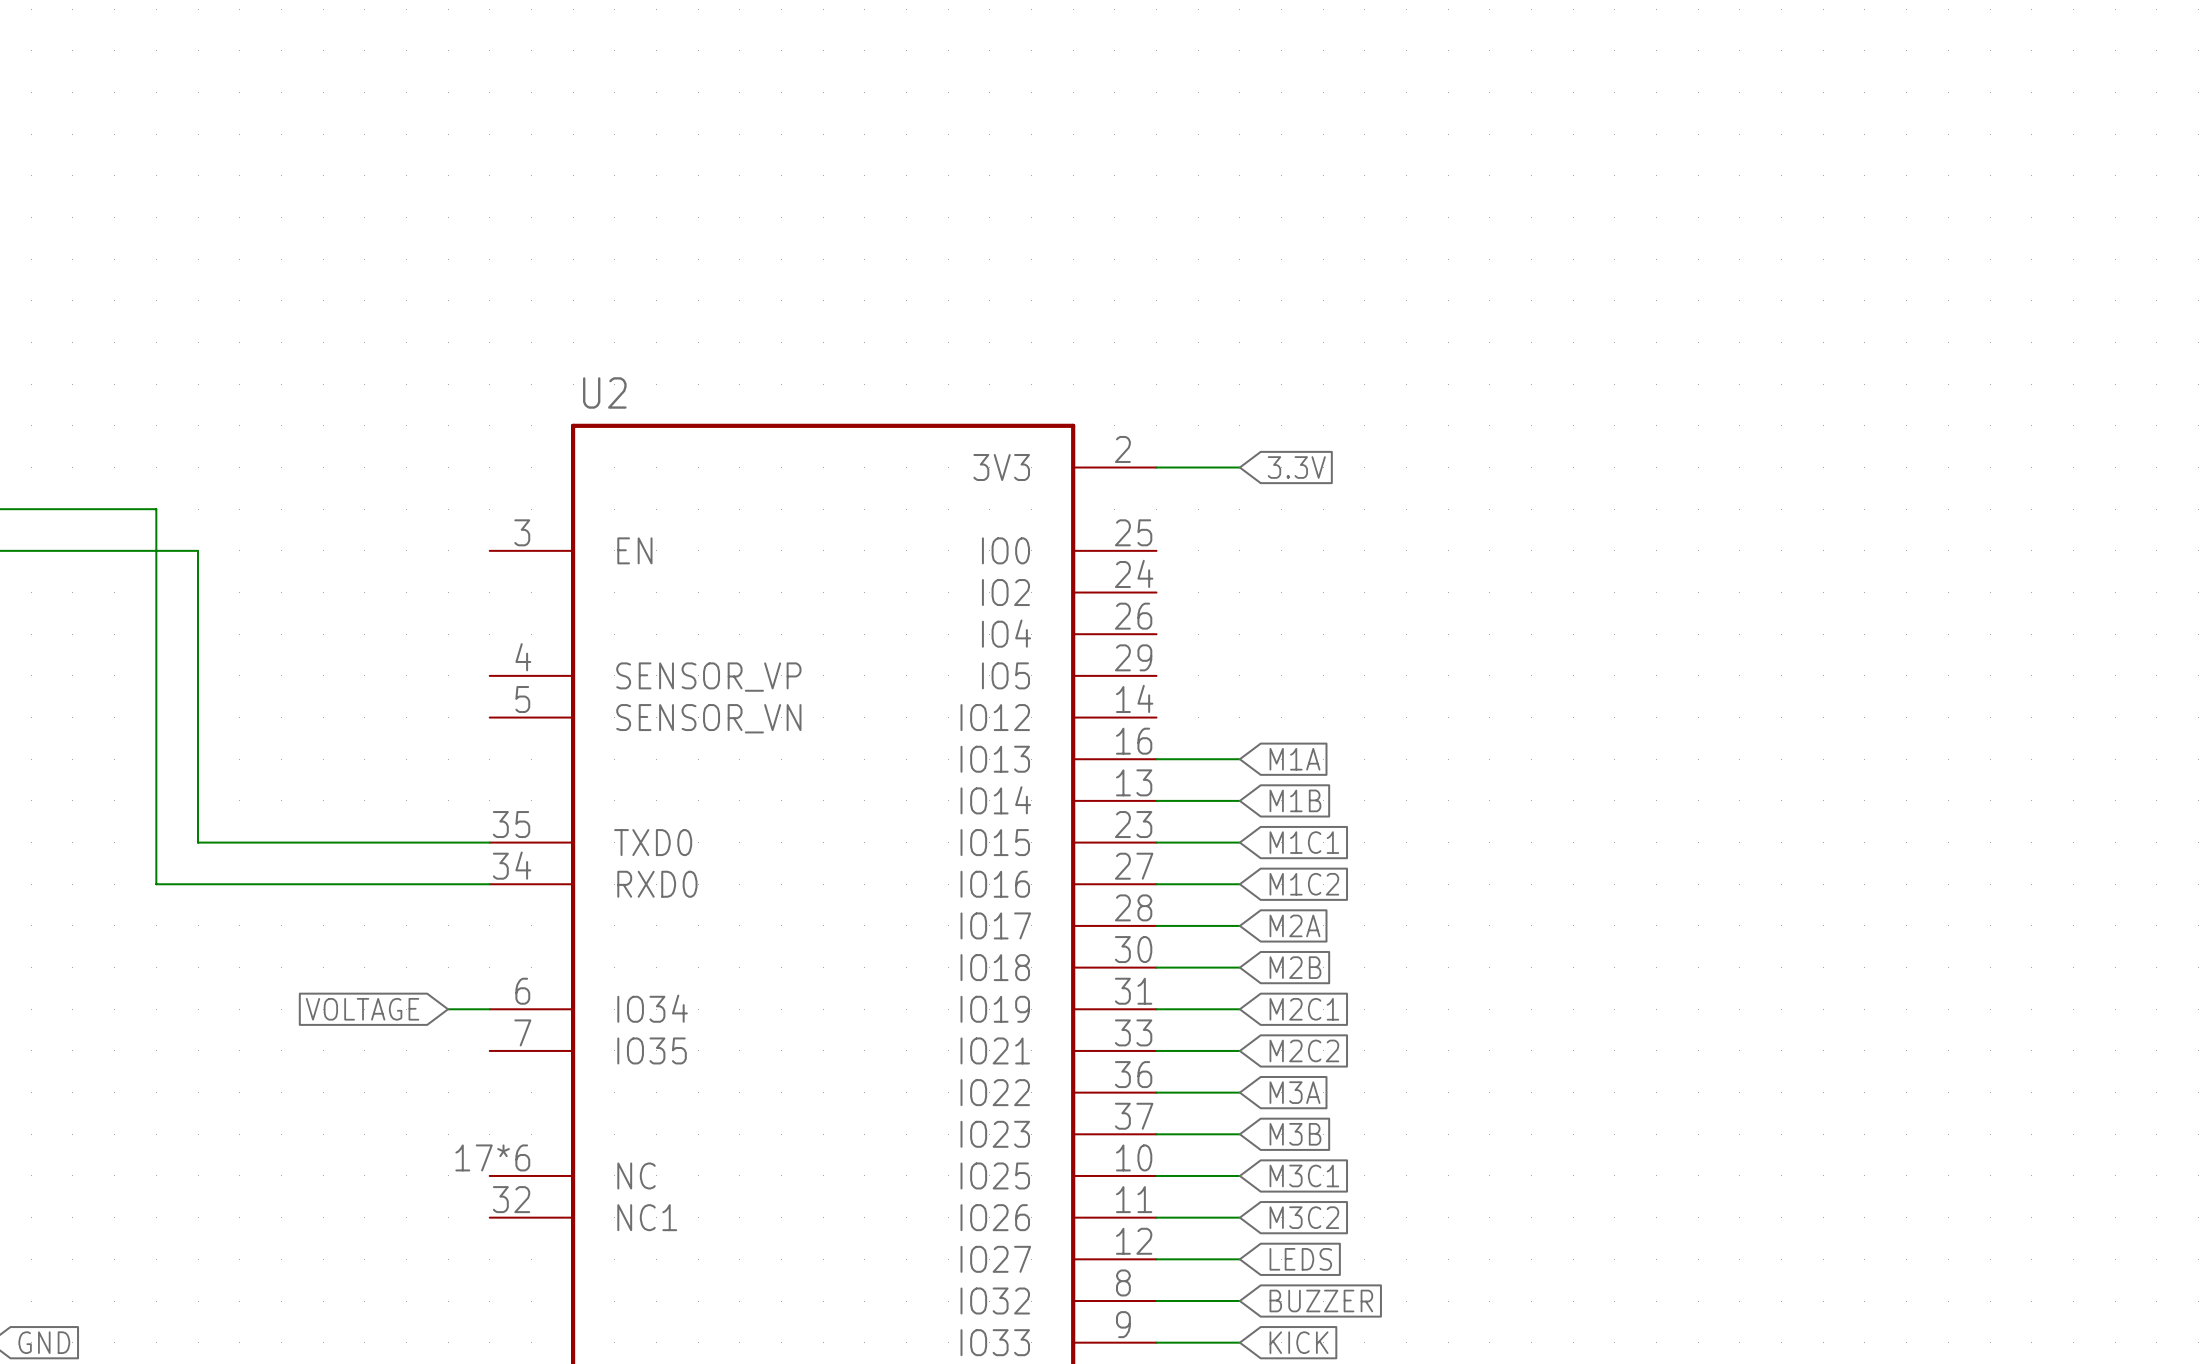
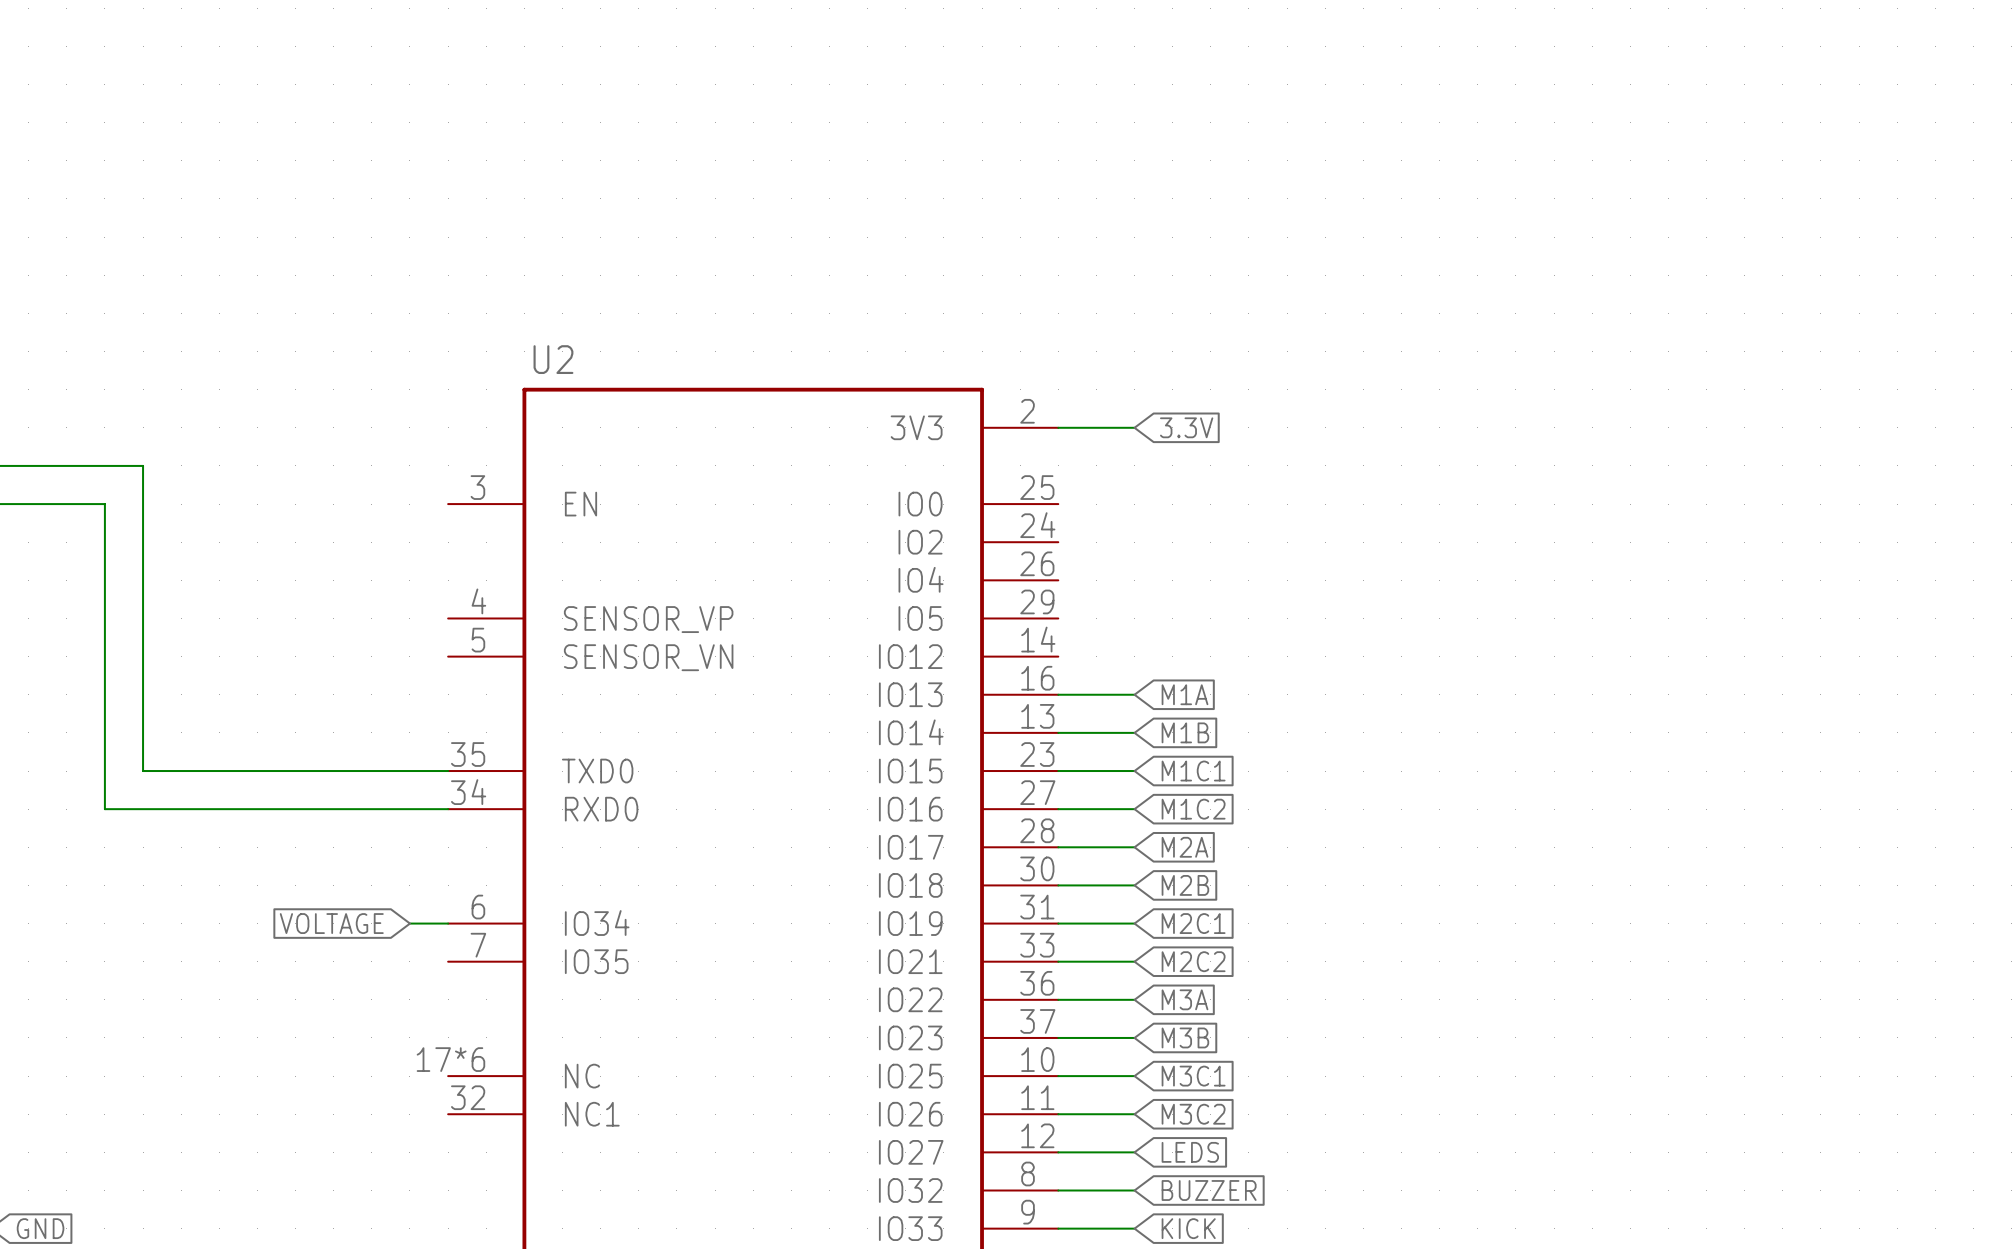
wire: (114, 550) (198, 550) (198, 842) -> (104, 504) (104, 809) (143, 809)
wire: (156, 842) (156, 884) -> (143, 771) (181, 771)

